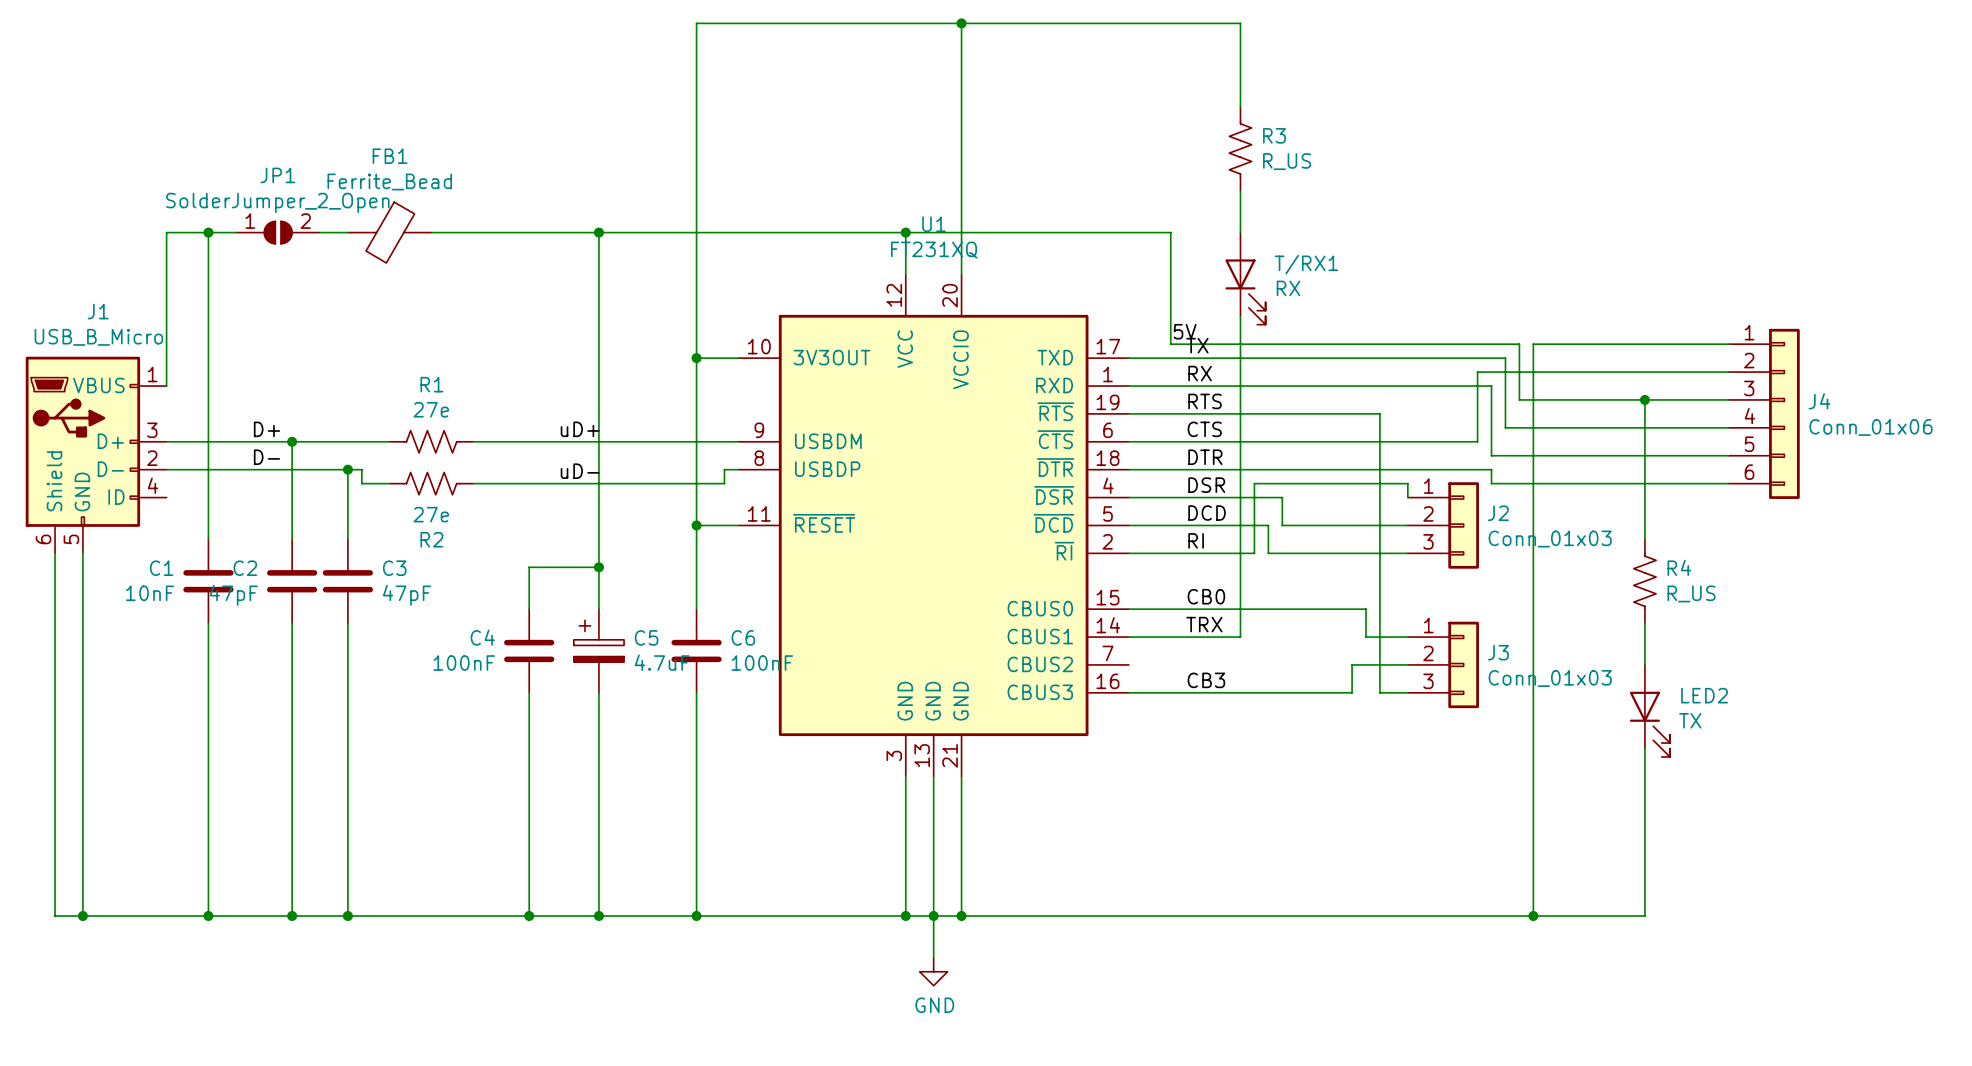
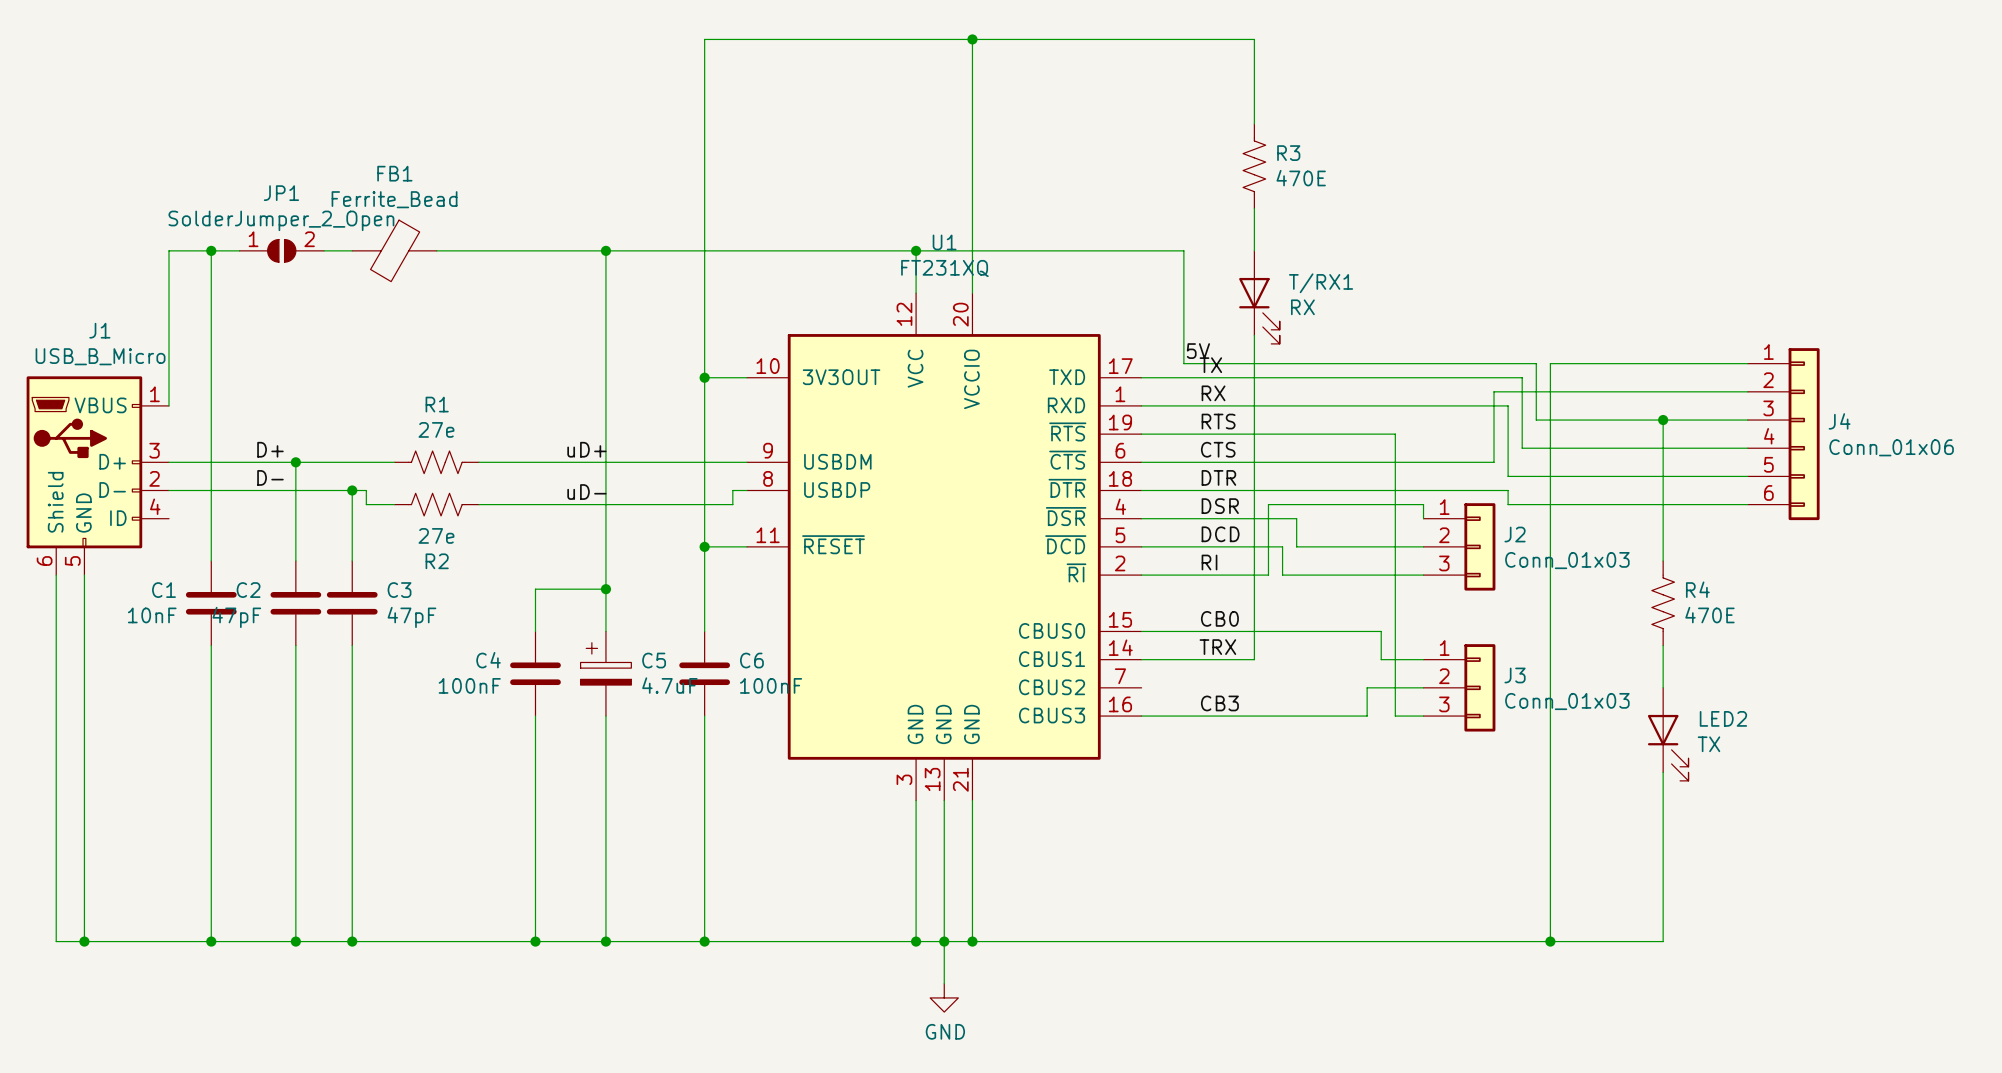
R3 value: R_US (1287, 161) -> 470E (1301, 178)
R4 value: R_US (1691, 593) -> 470E (1709, 615)

